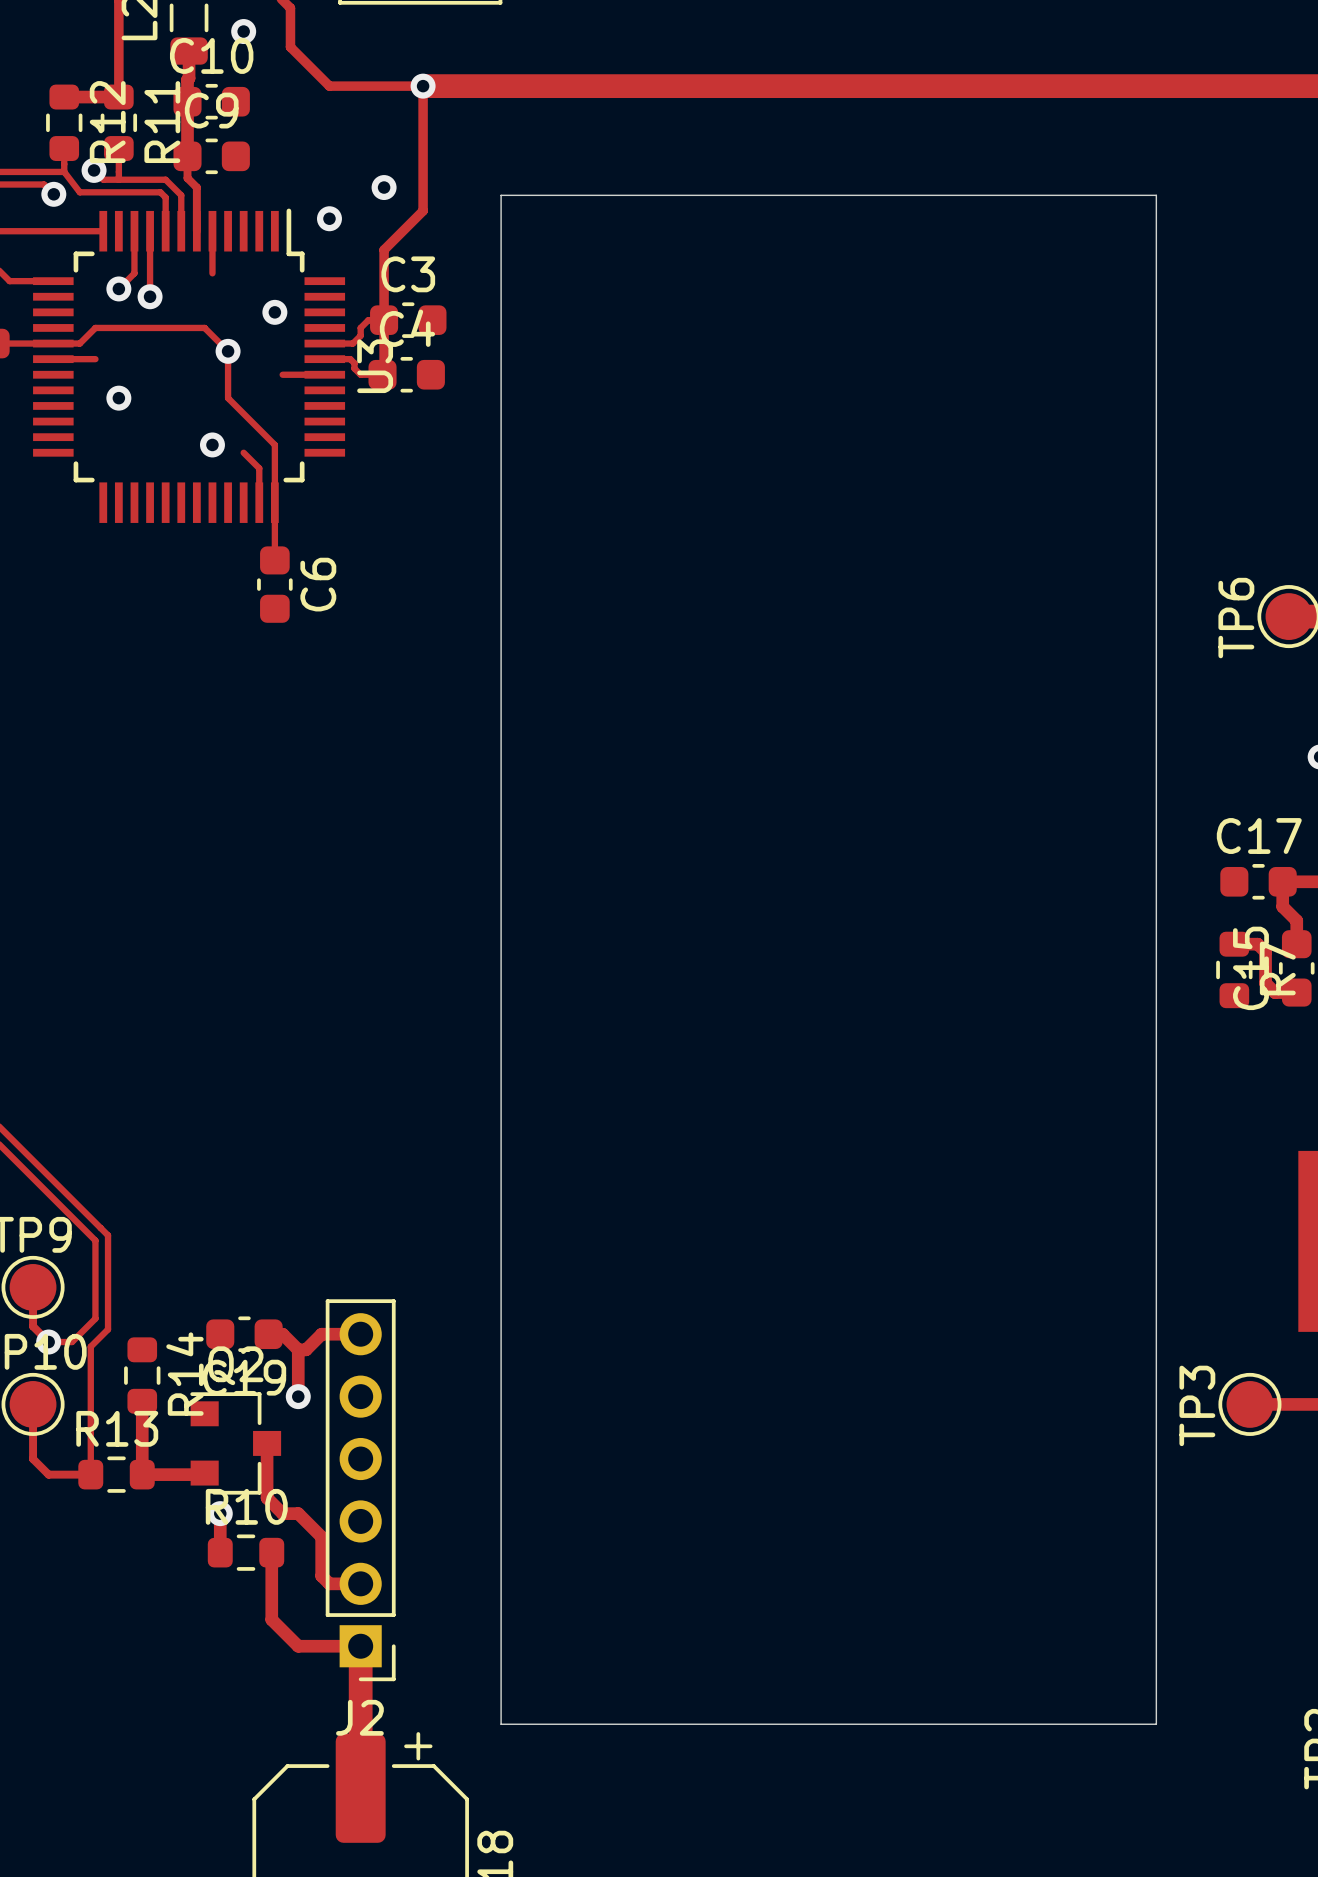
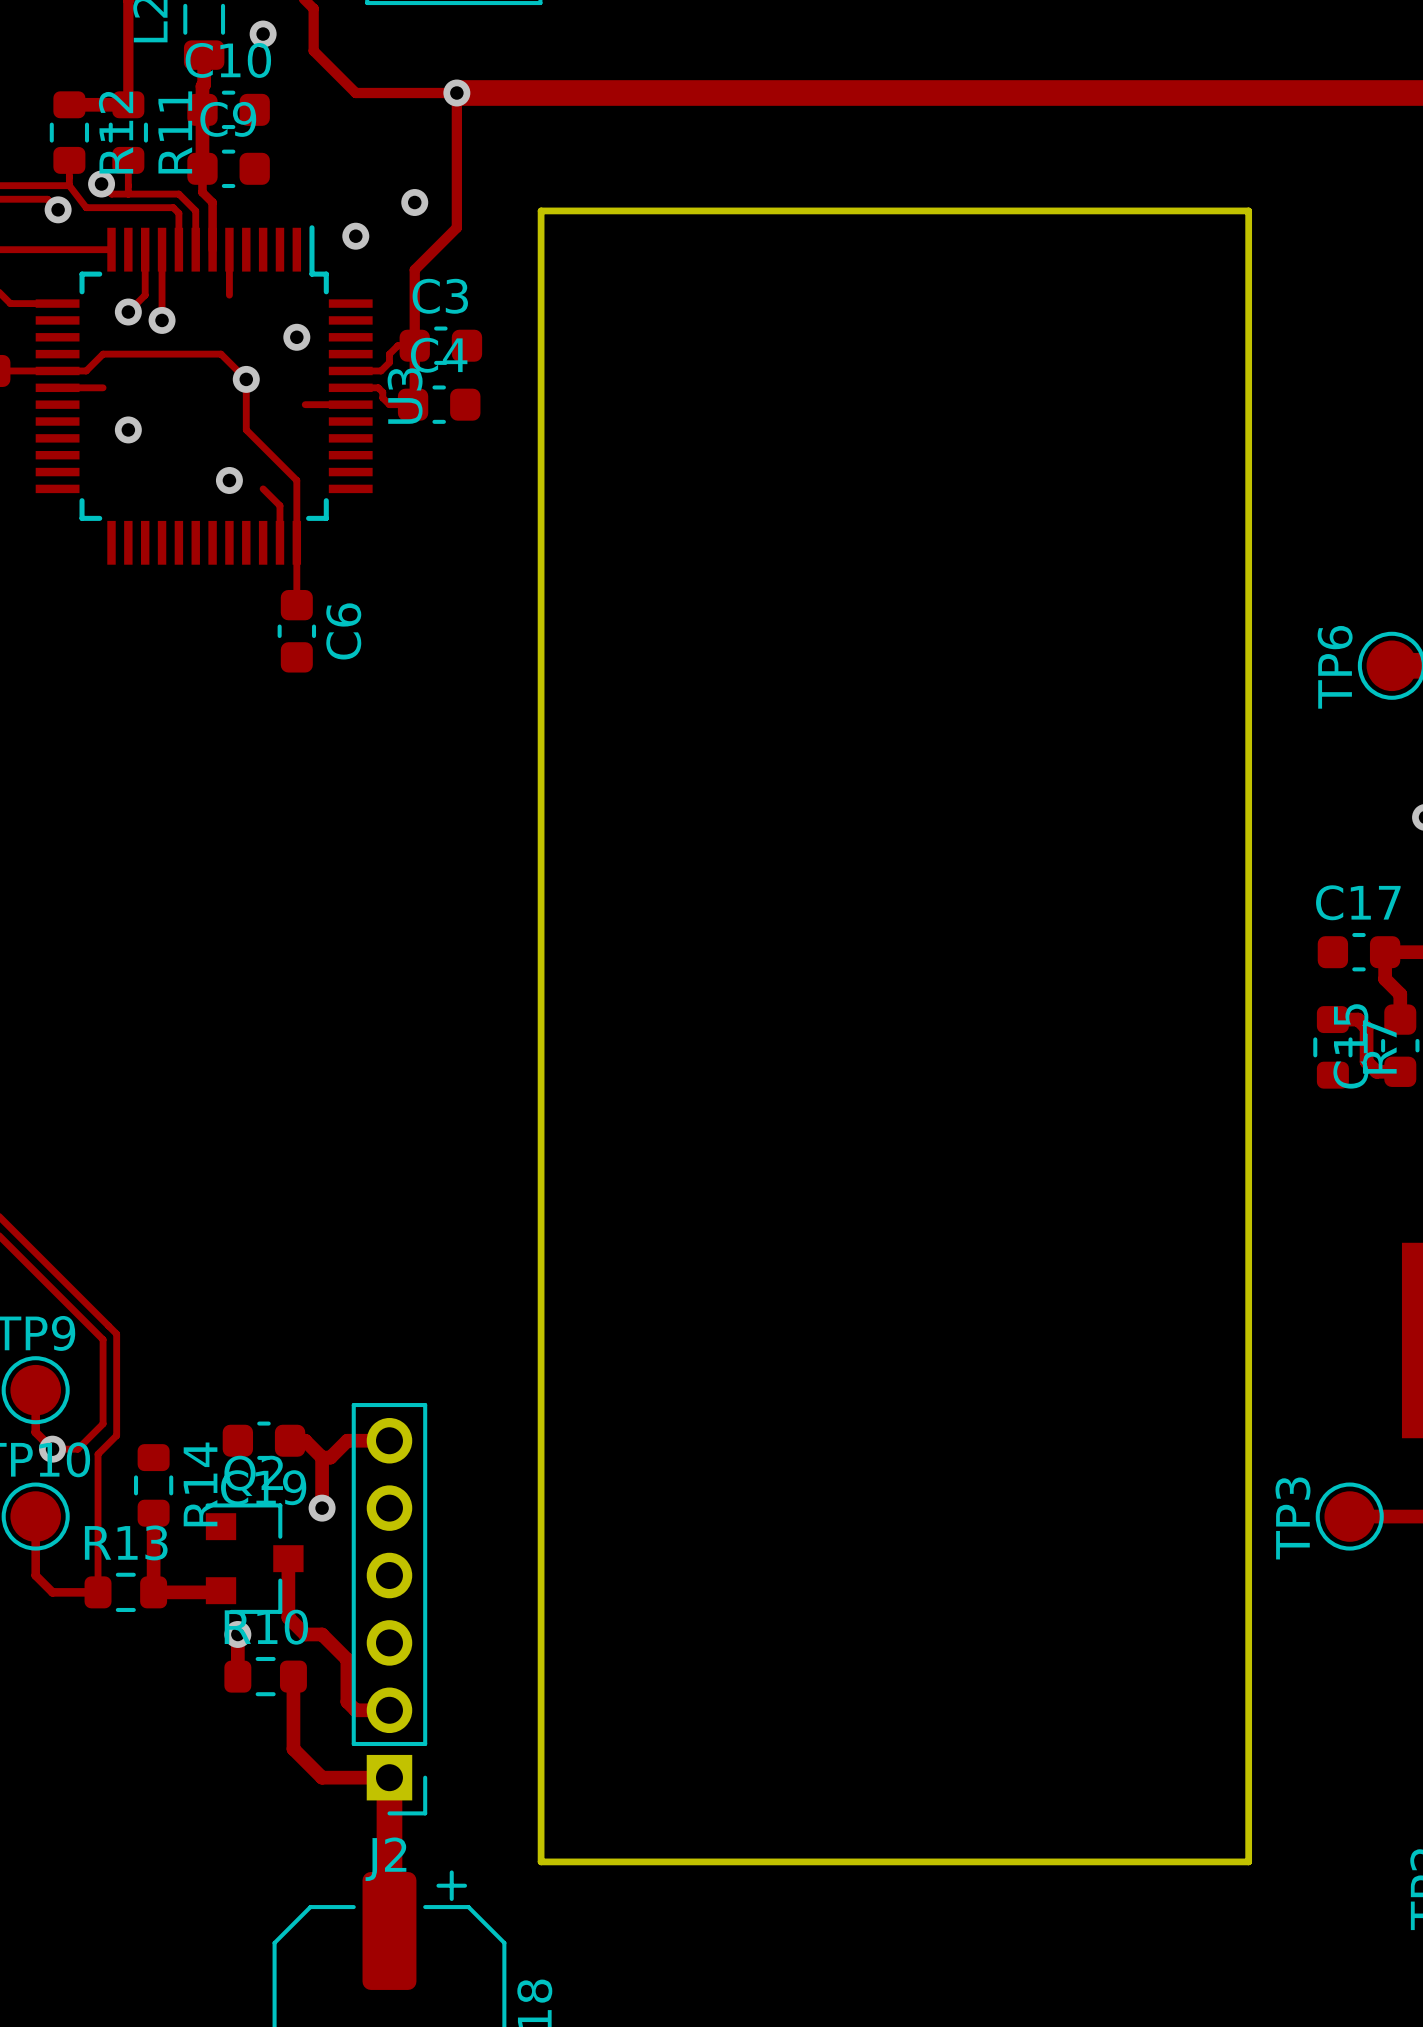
board edge width: thin (501, 195) (501, 1724) (1156, 1724) (1156, 195) (501, 195) -> thick (541, 210) (541, 1861) (1248, 1861) (1248, 210) (541, 210)

